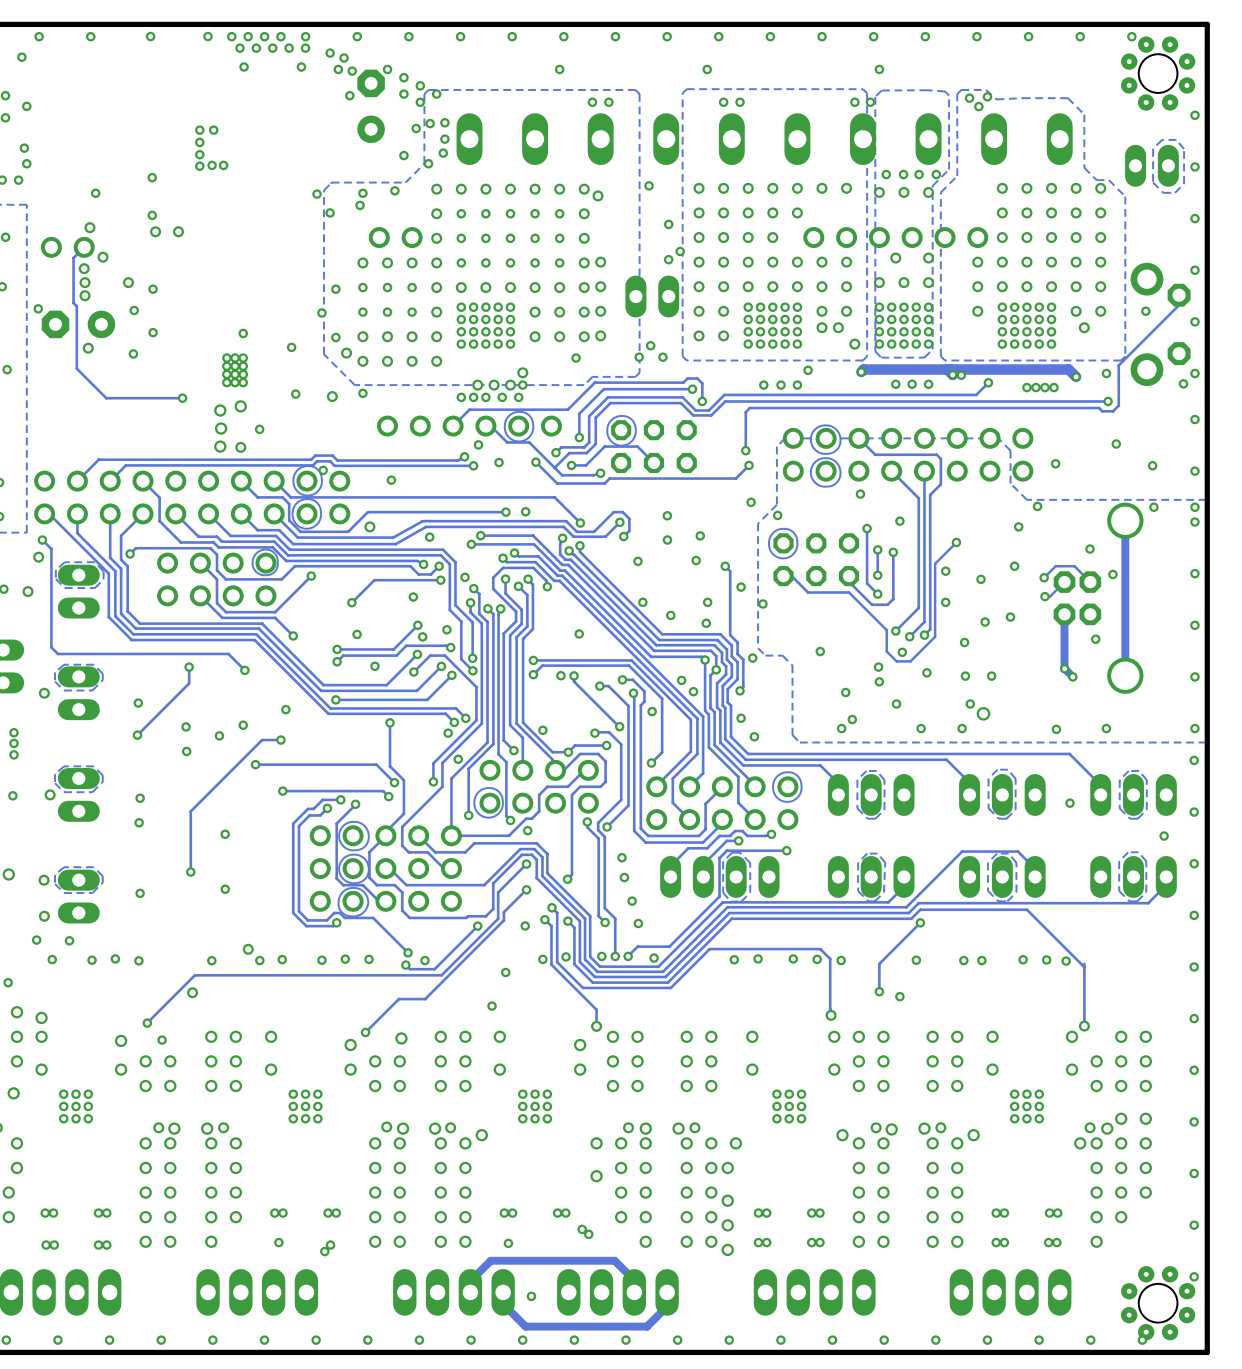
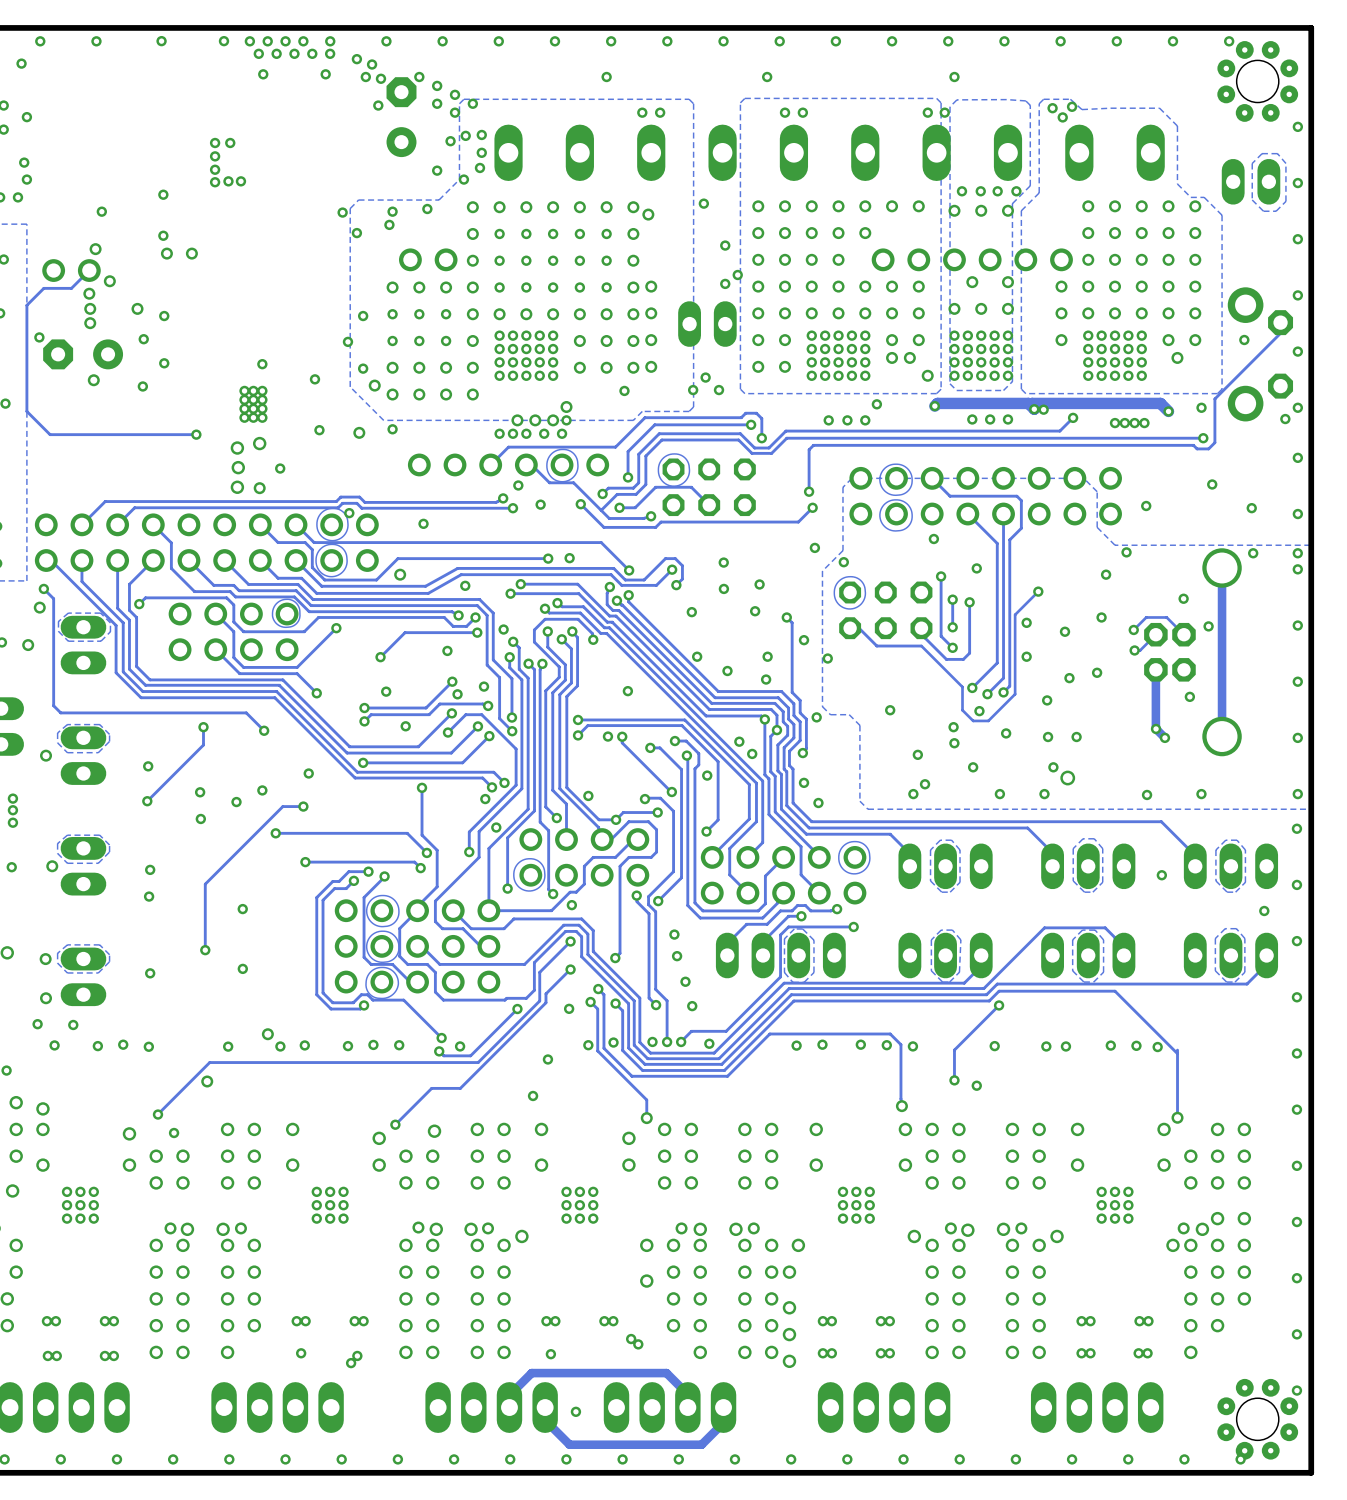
track: (73, 258) (73, 303) (76, 306) (76, 368) (106, 398) -> (77, 282) (71, 288) (43, 288) (26, 305) (26, 411) (50, 434) (113, 434)

